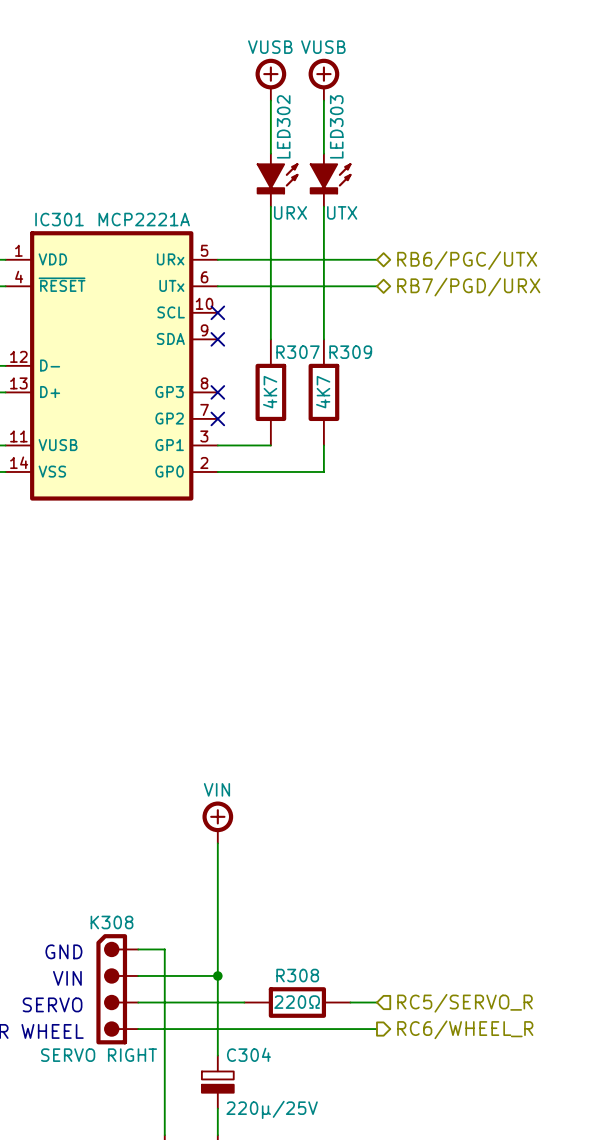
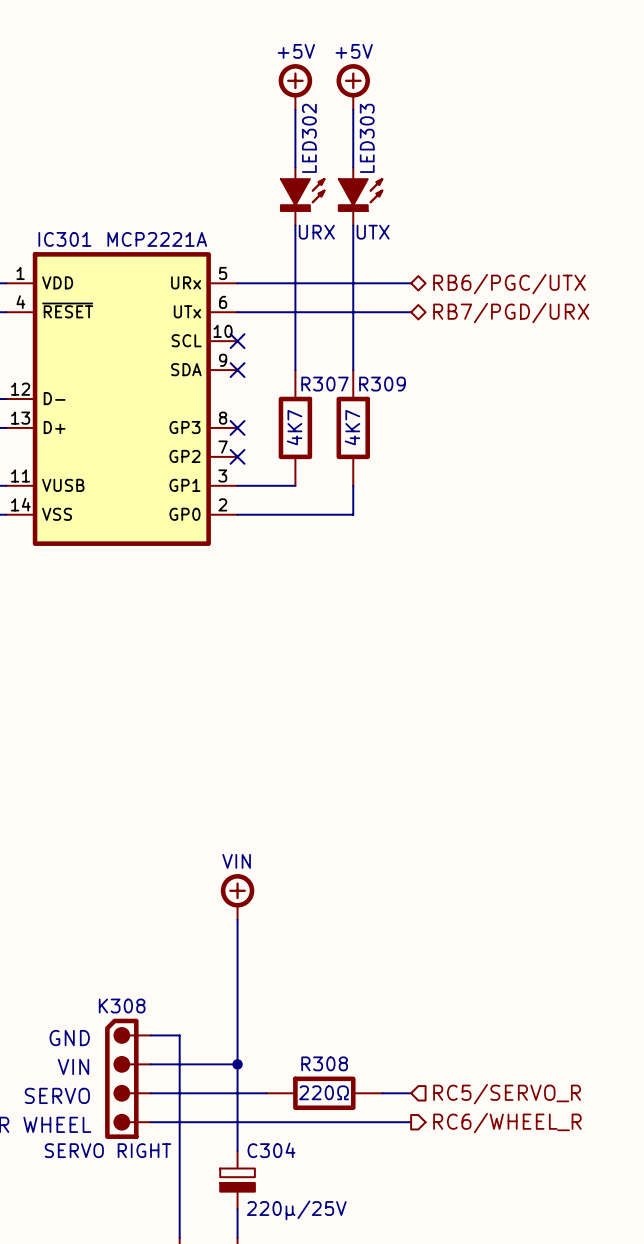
power symbol text: VUSB (270, 47) -> +5V (296, 51)
power symbol text: VUSB (323, 47) -> +5V (354, 51)

